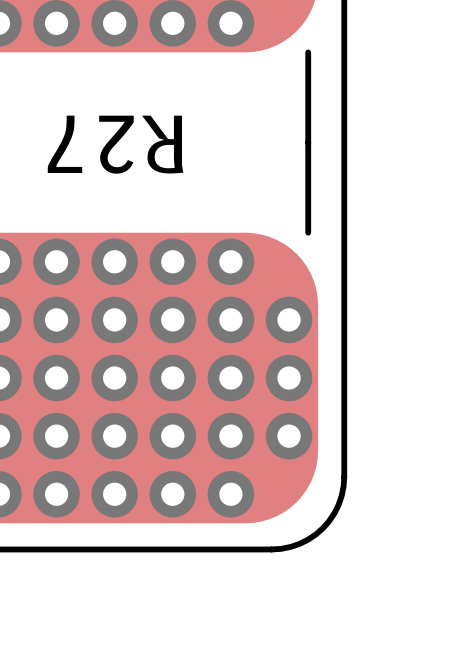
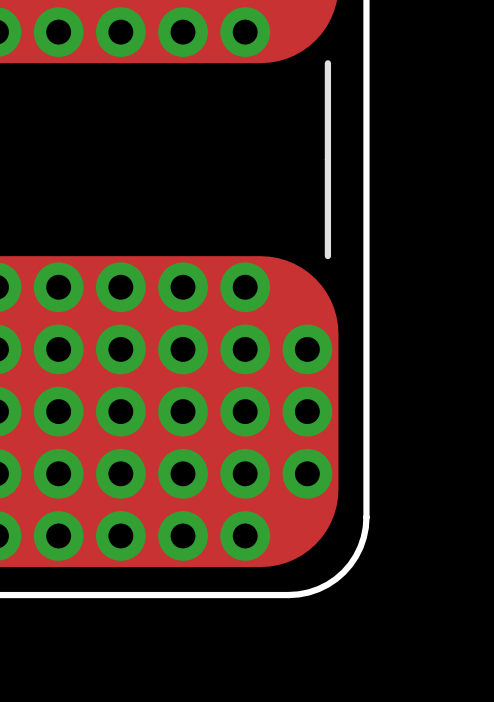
R27 name: R27 (115, 144) -> none

